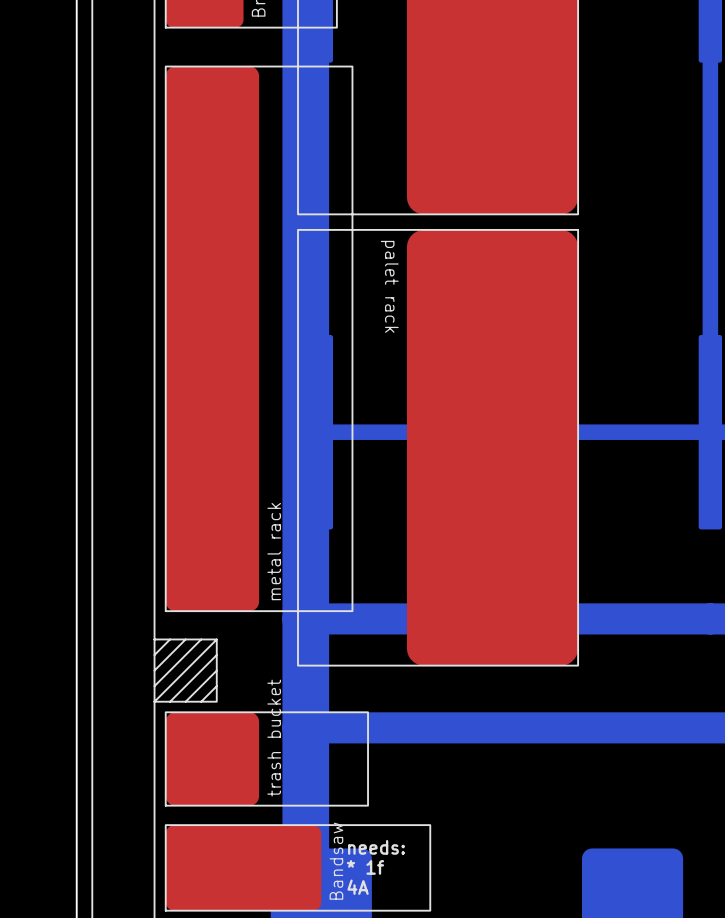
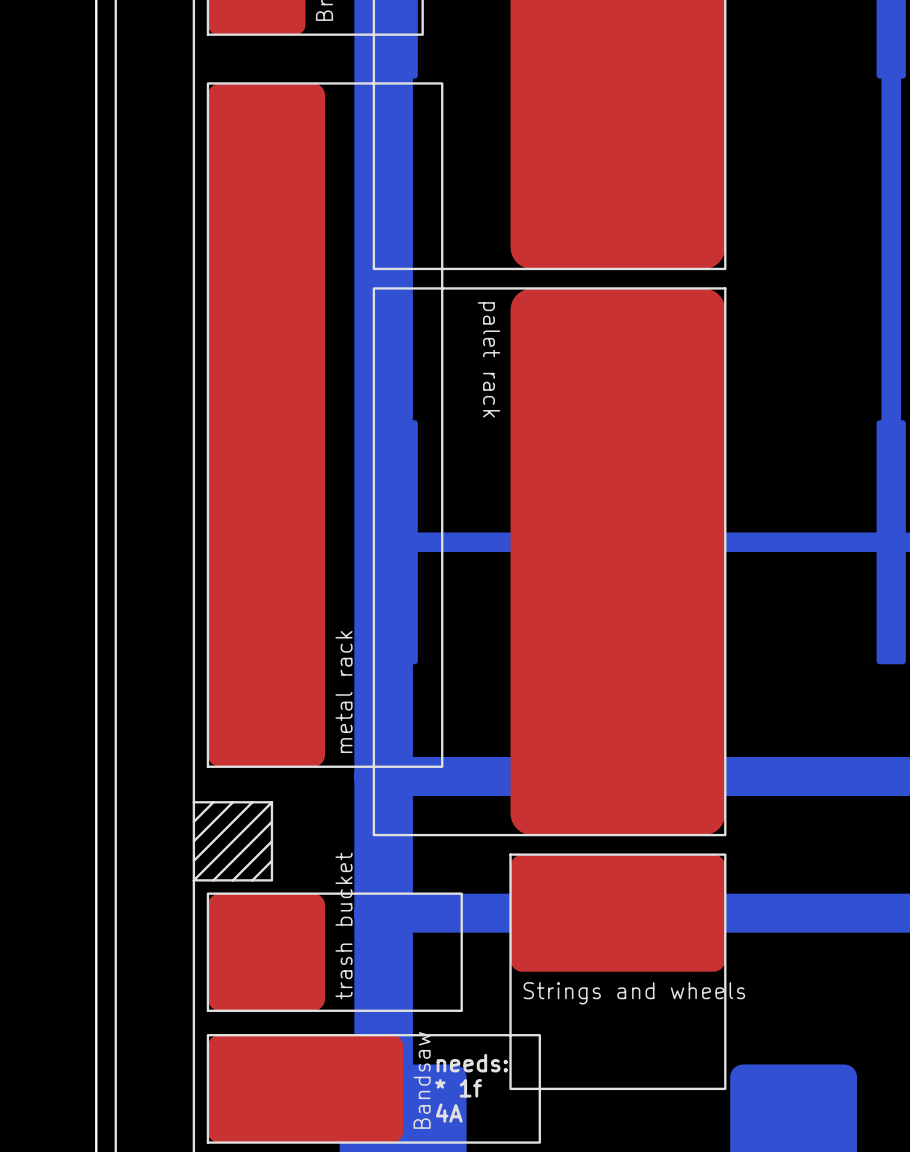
part: none -> Strings and wheels (617, 971)

